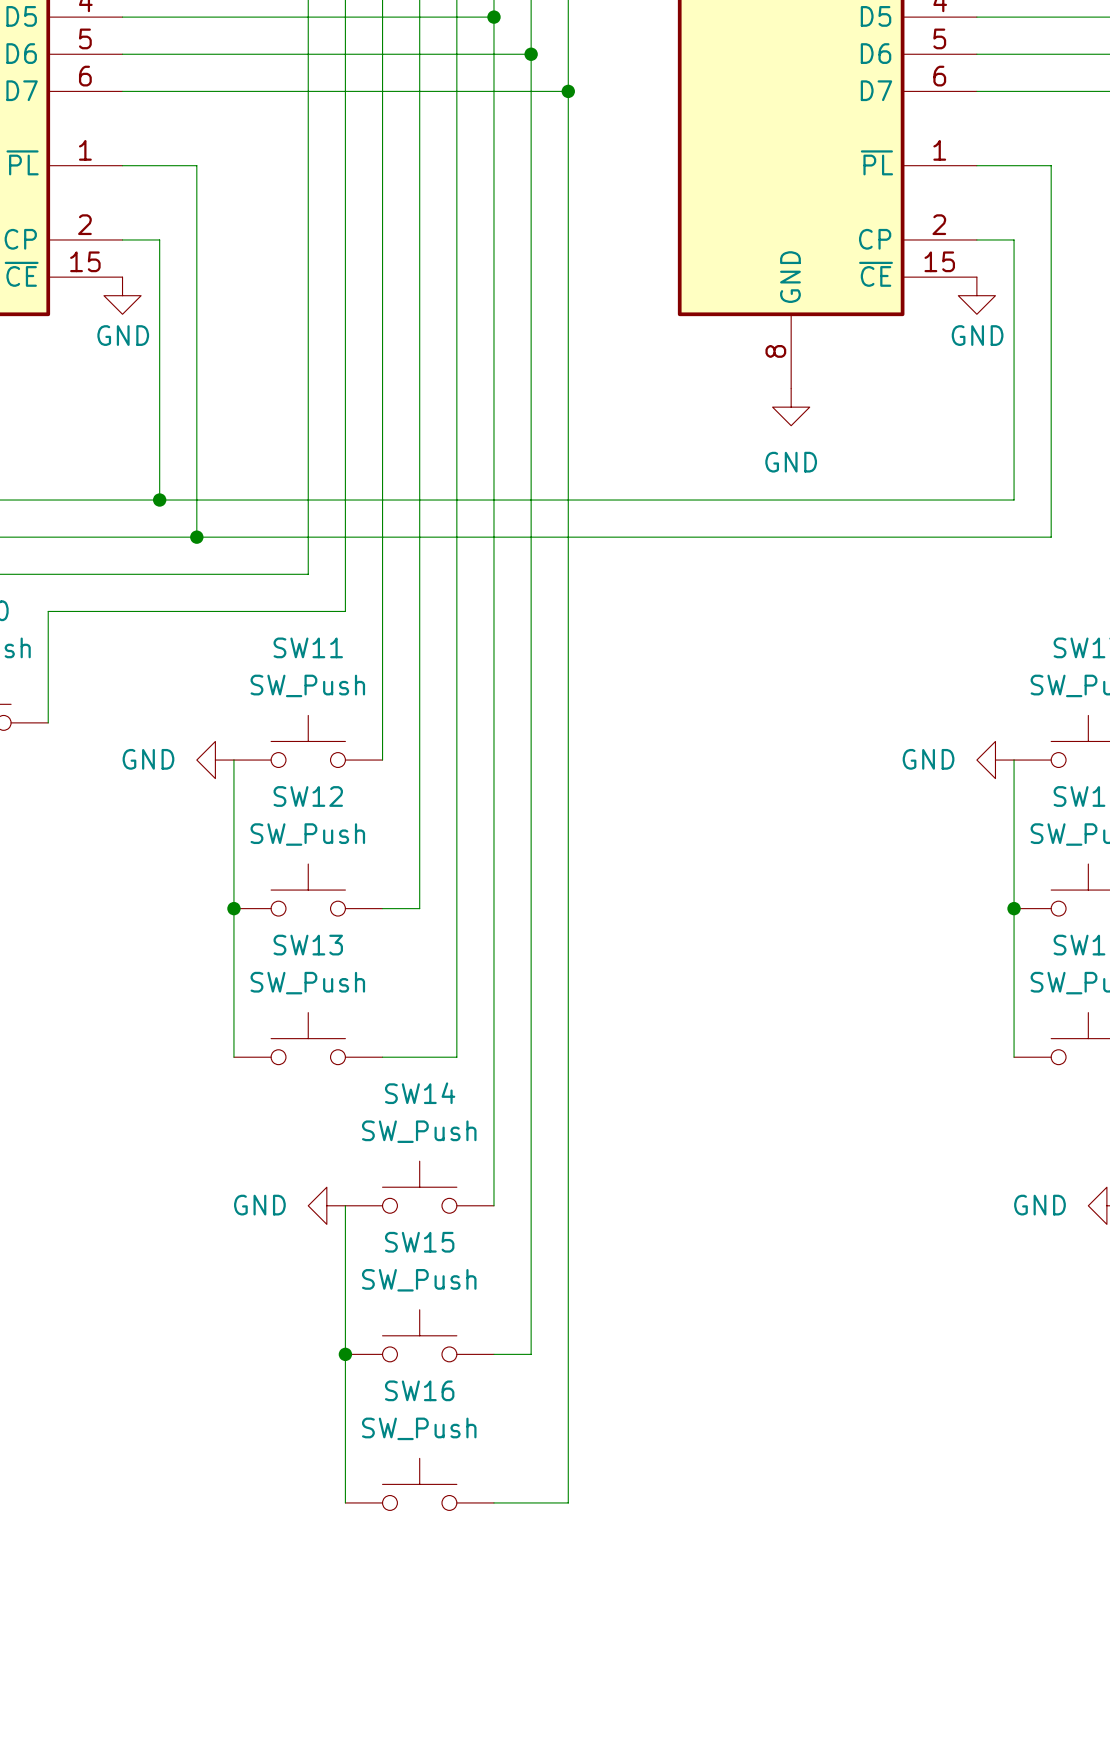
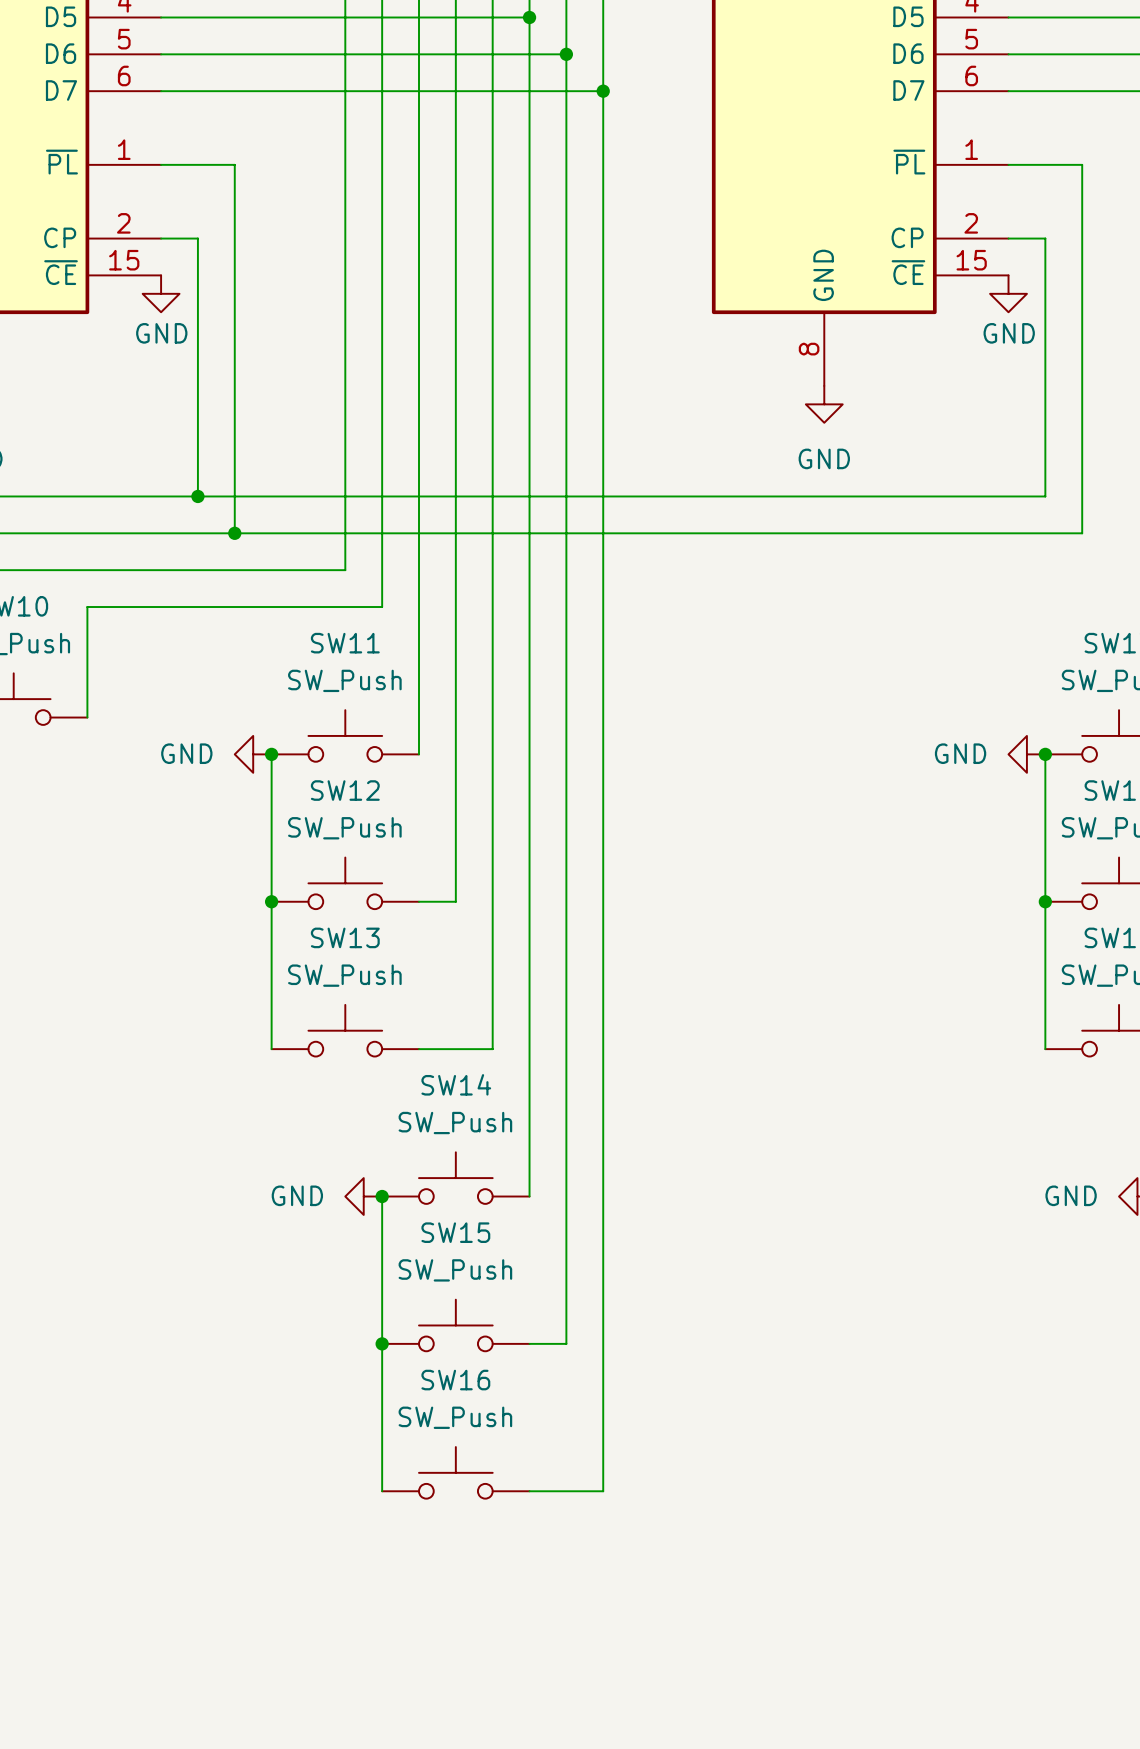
junction: none -> (271, 754)
junction: none -> (1045, 754)
junction: none -> (382, 1196)

